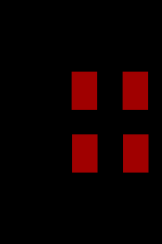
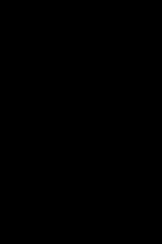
part: (109, 90) -> none
part: (110, 153) -> none

